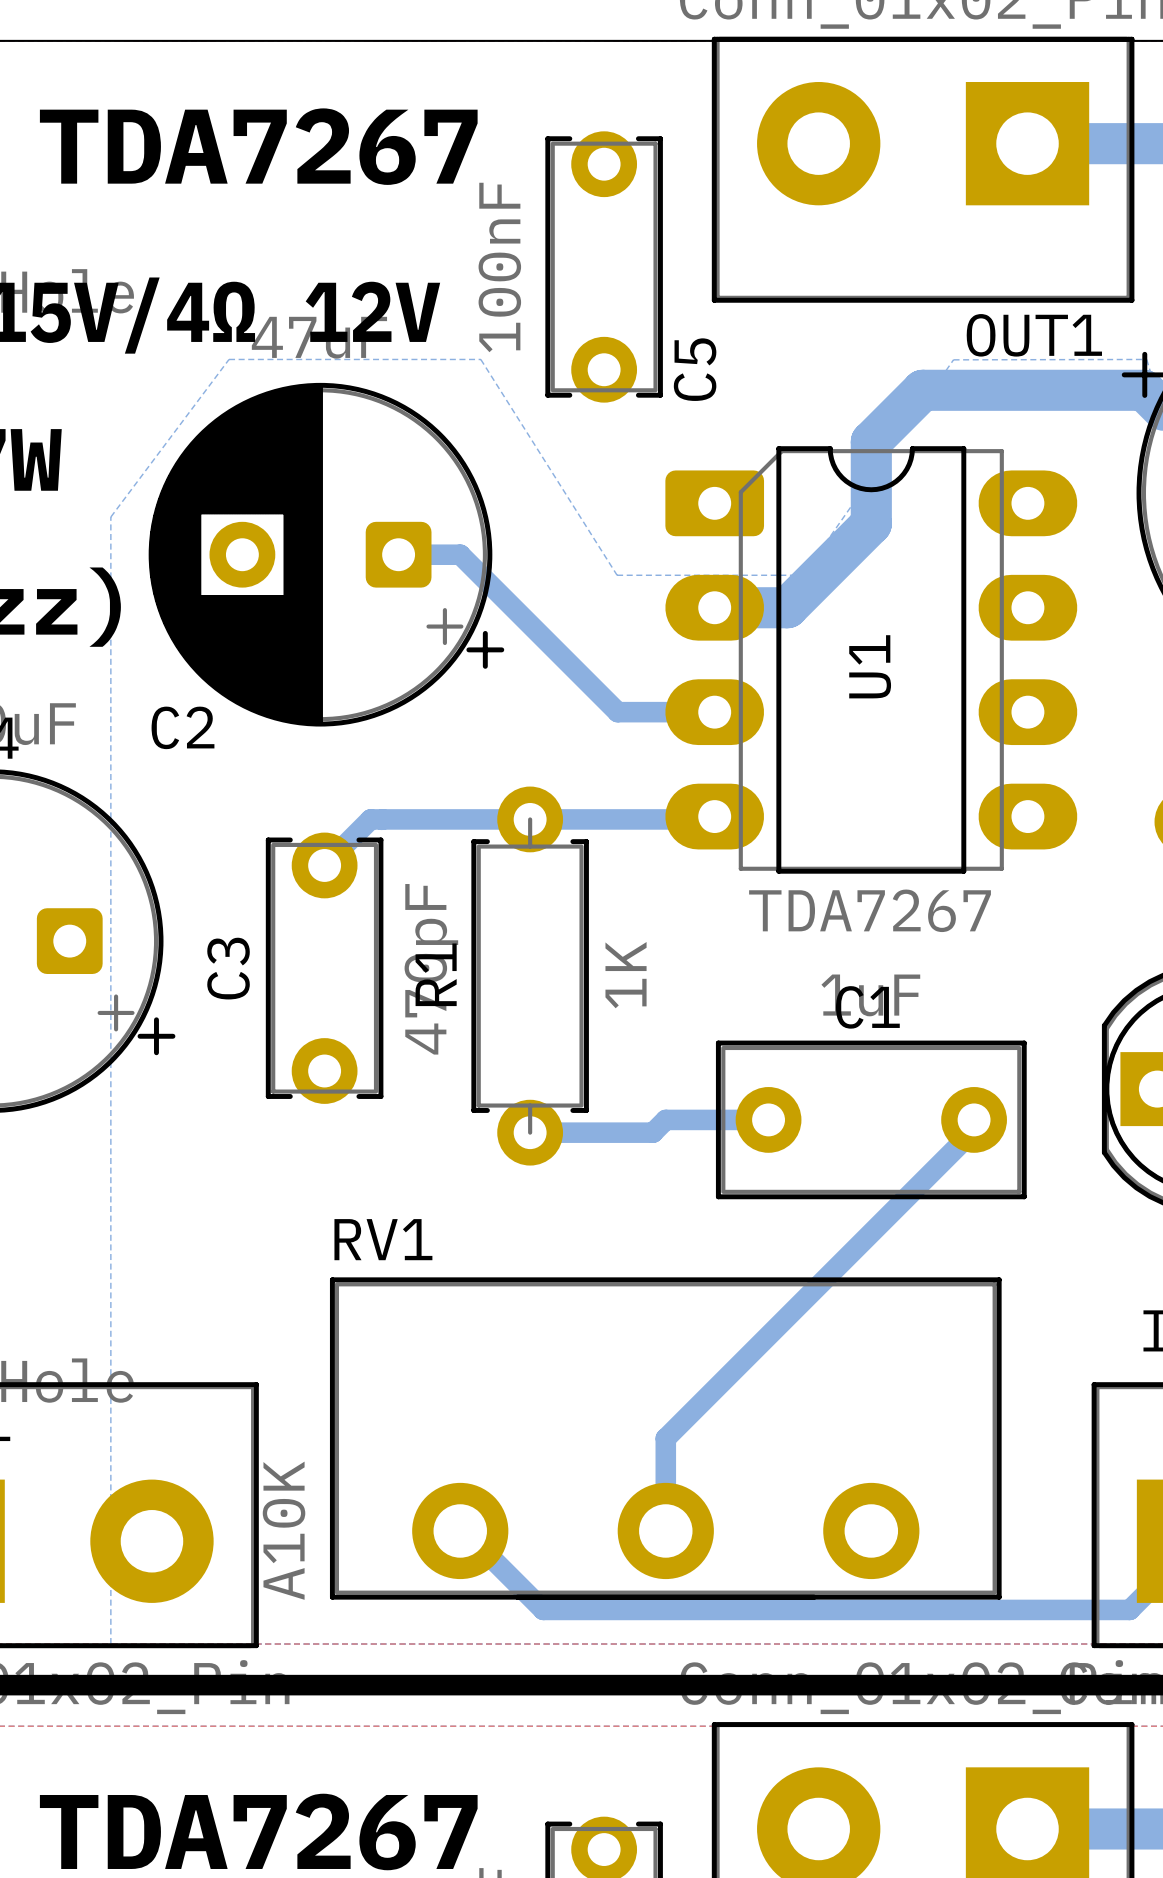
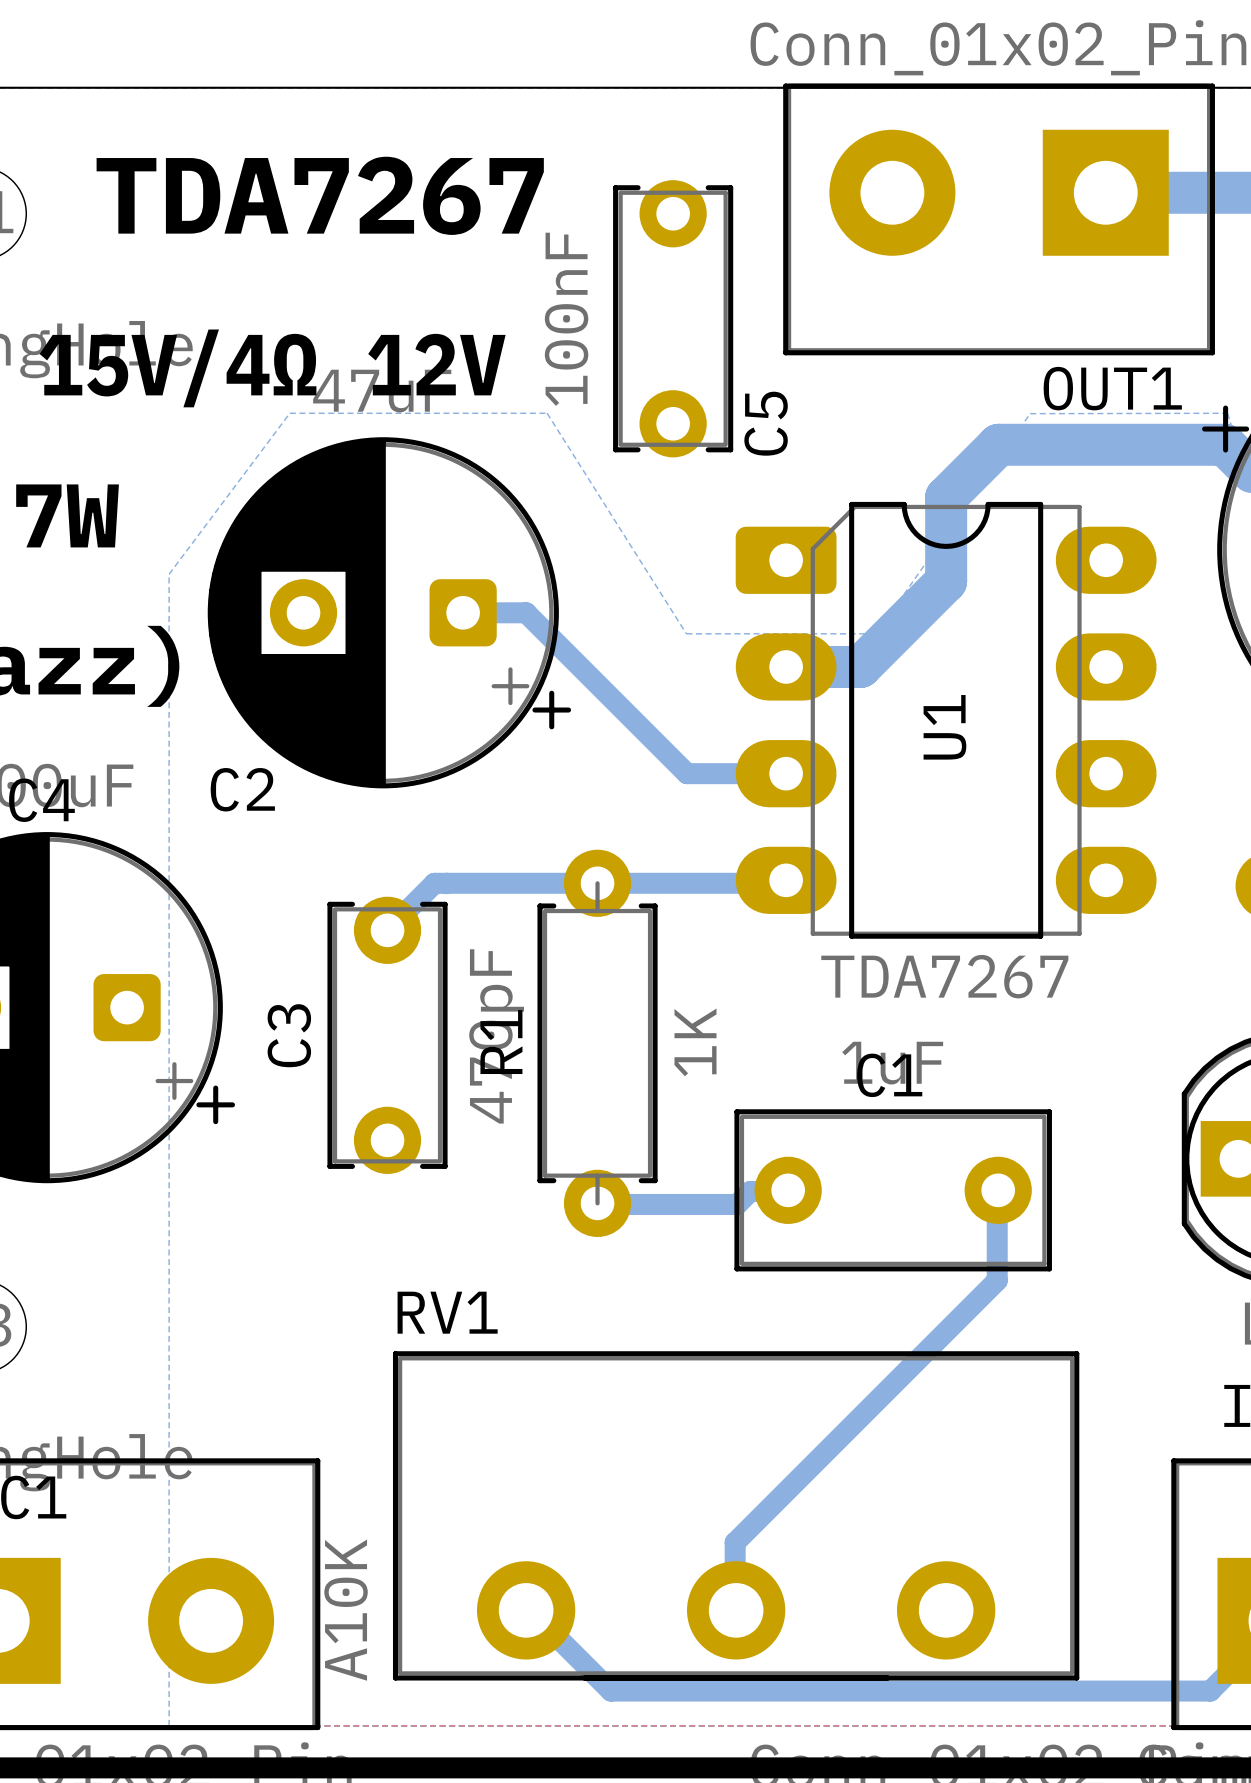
bottom track: (768, 1119) (665, 1119) (653, 1132) (530, 1132) -> (787, 1191) (750, 1191) (737, 1204) (596, 1204)
C1 position: (871, 1119) -> (893, 1190)
bottom track: (974, 1119) (974, 1130) (665, 1438) (665, 1530) -> (997, 1191) (997, 1280) (735, 1542) (735, 1611)

